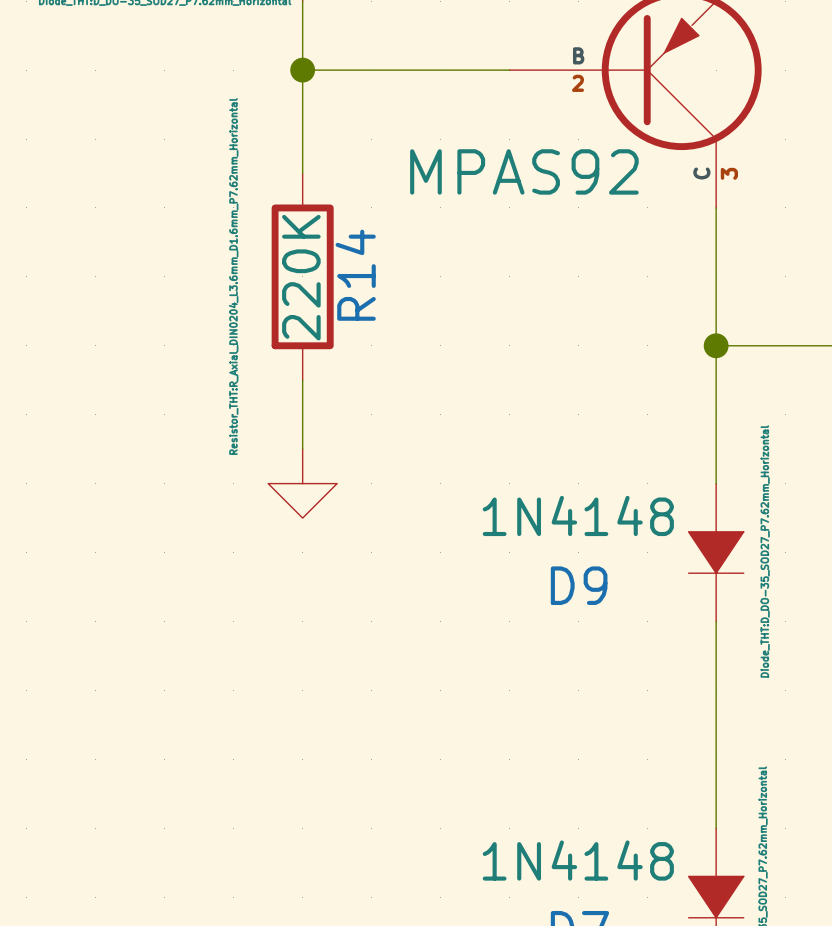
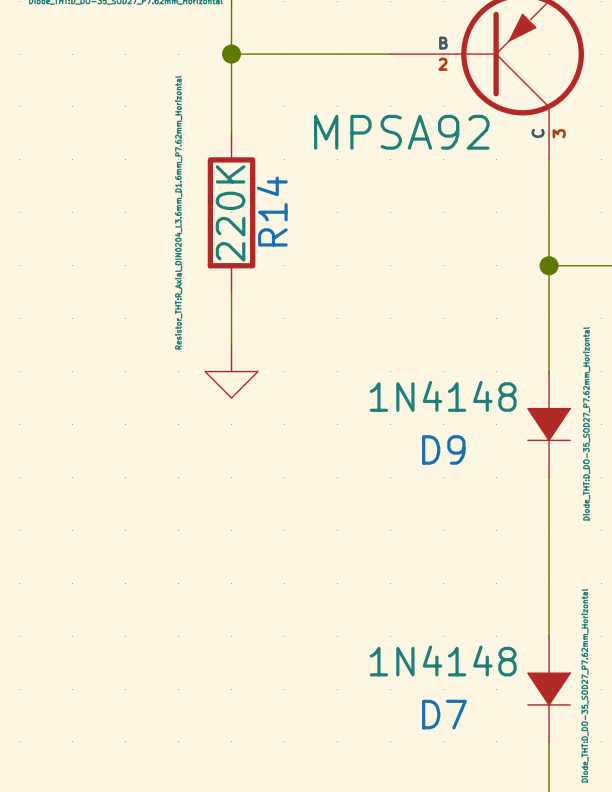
part value: MPAS92 (524, 171) -> MPSA92 (401, 132)

